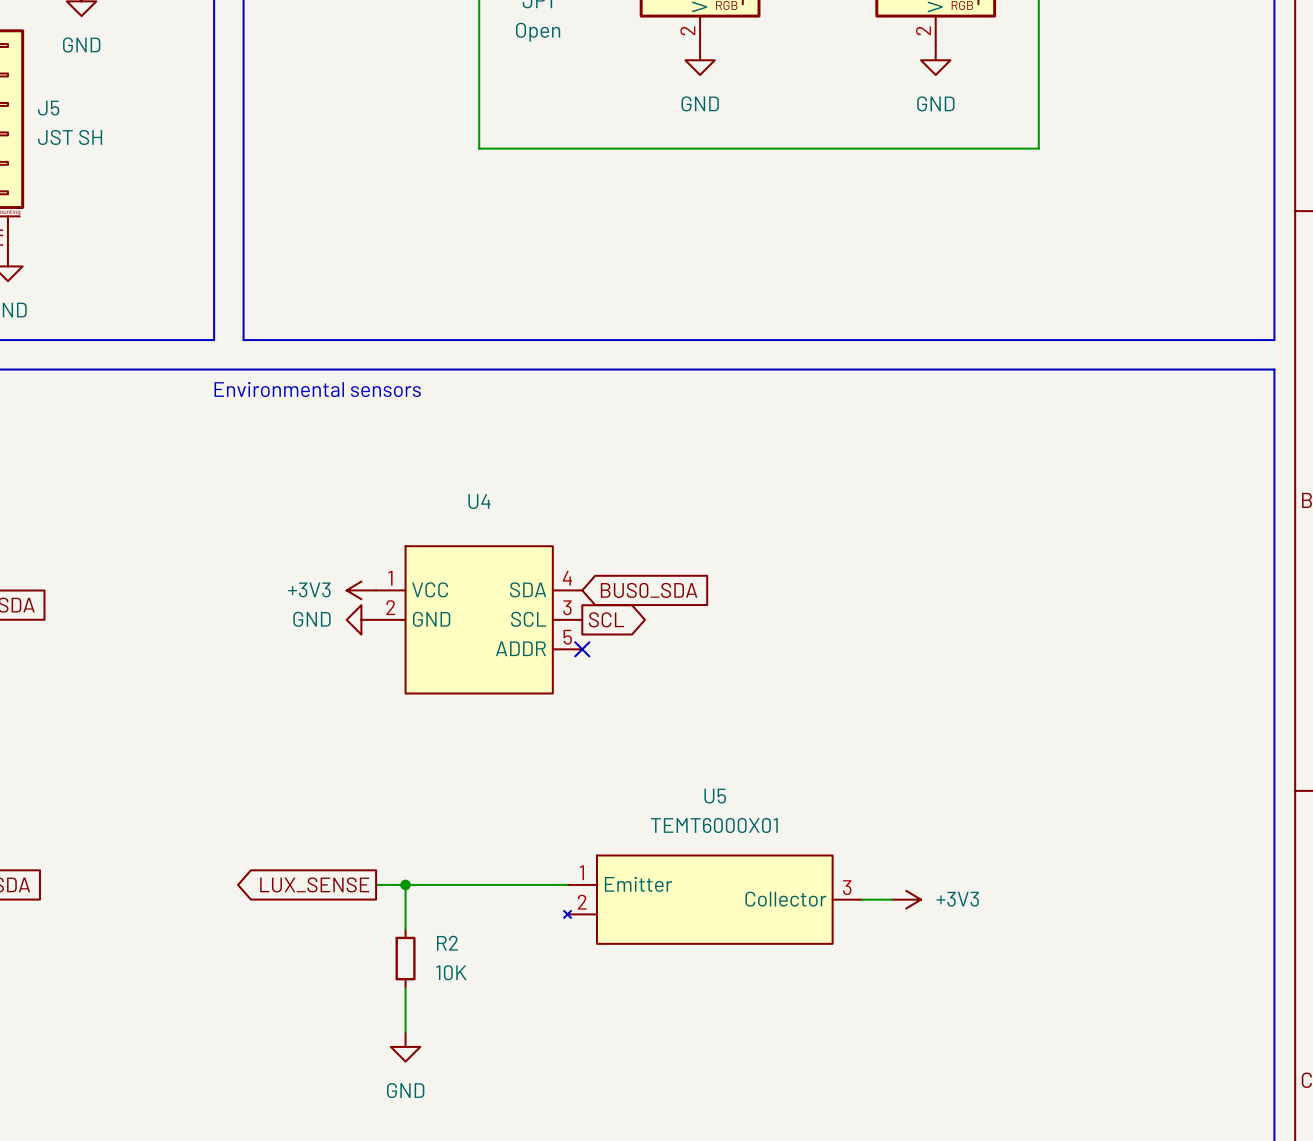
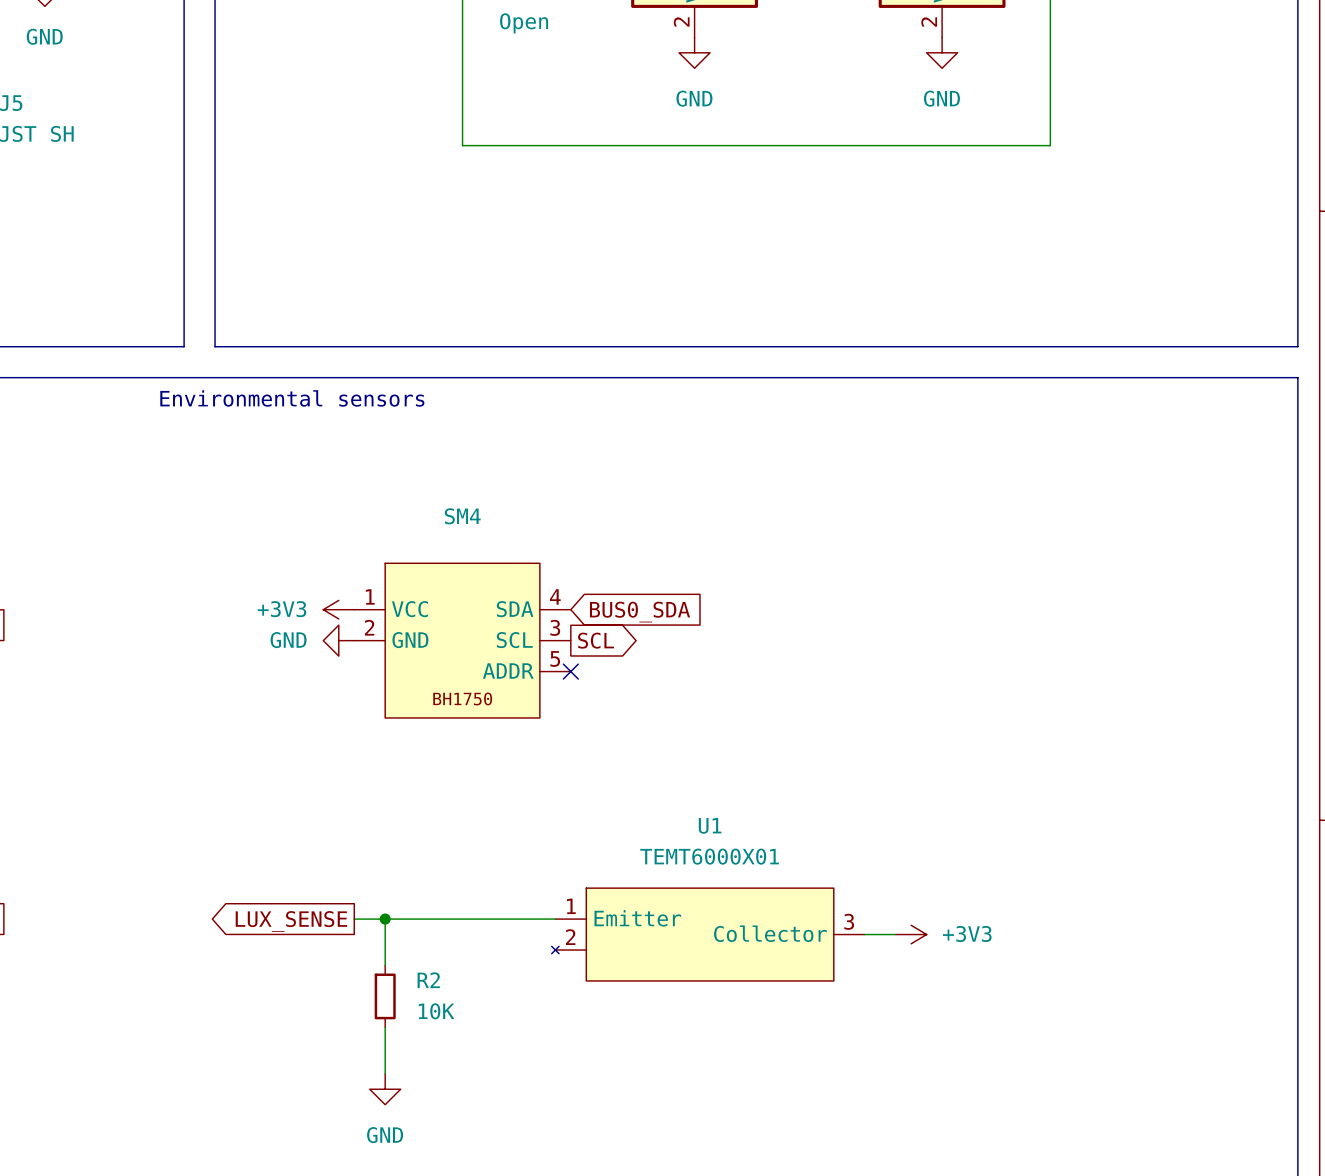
U4 name: U4 (479, 501) -> SM4 (462, 516)
U4 text: none -> BH1750 (462, 698)
U5 name: U5 (715, 796) -> U1 (710, 825)

